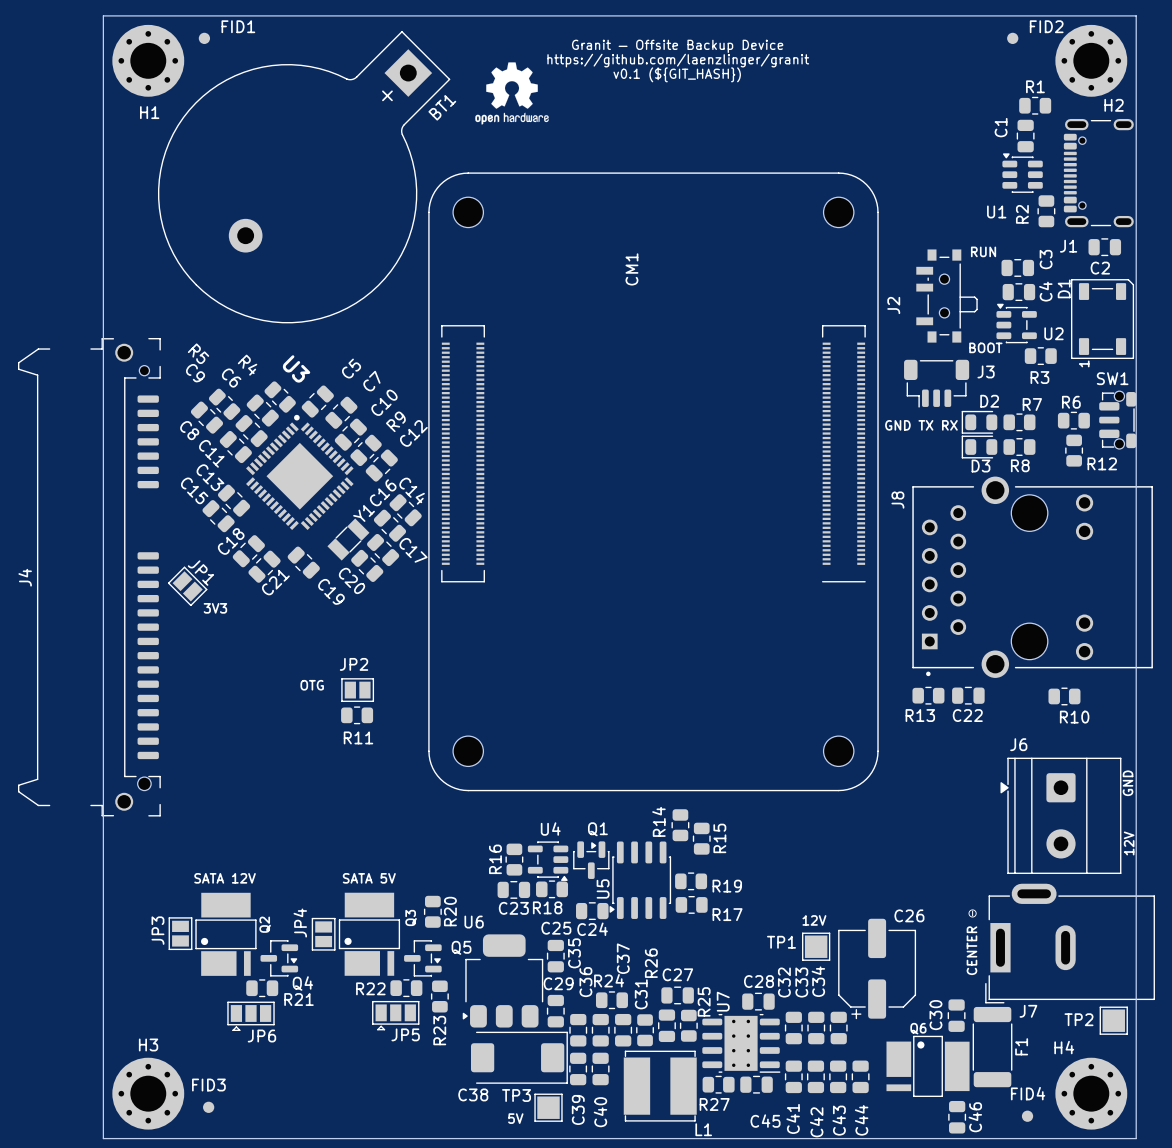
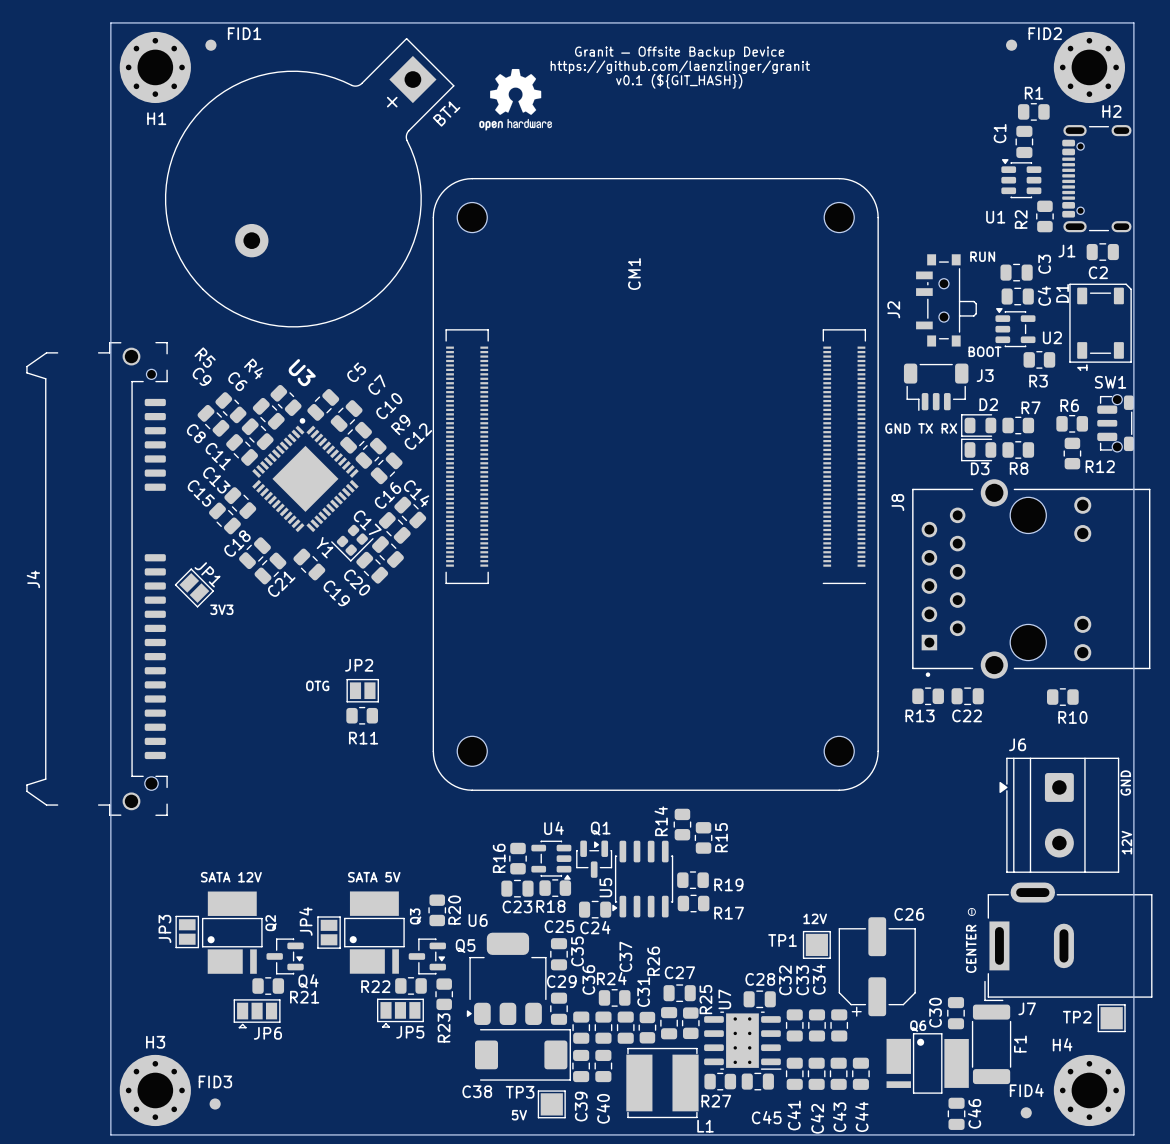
Y1 name position: Y1 (364, 513) -> Y1 (325, 547)
Y1 footprint: [327, 518, 370, 561] -> [331, 524, 374, 562]
C17 name position: C17 (413, 550) -> C17 (367, 522)

